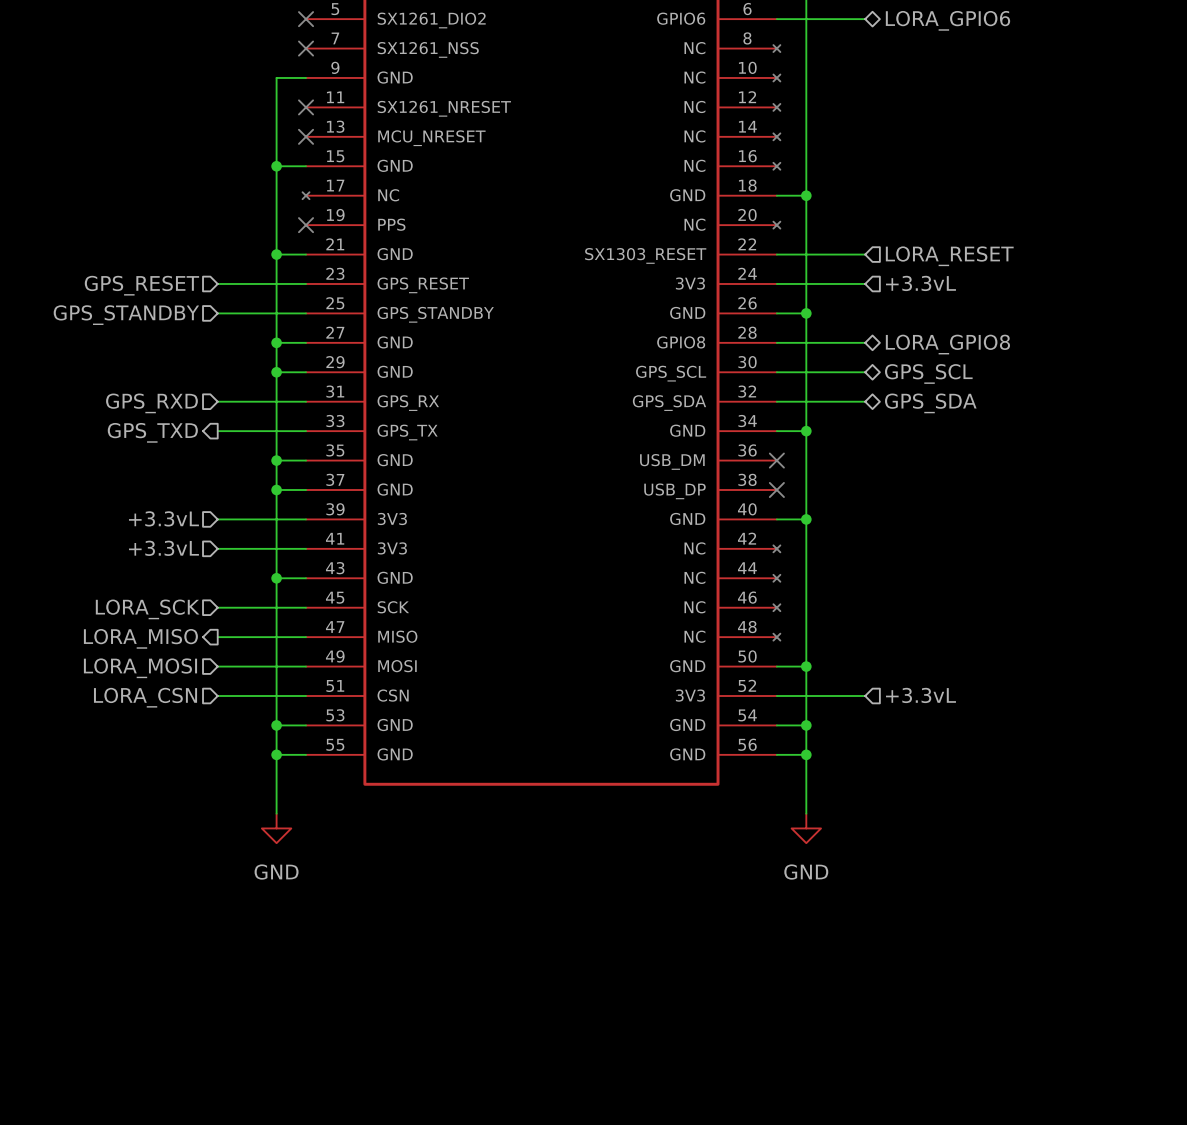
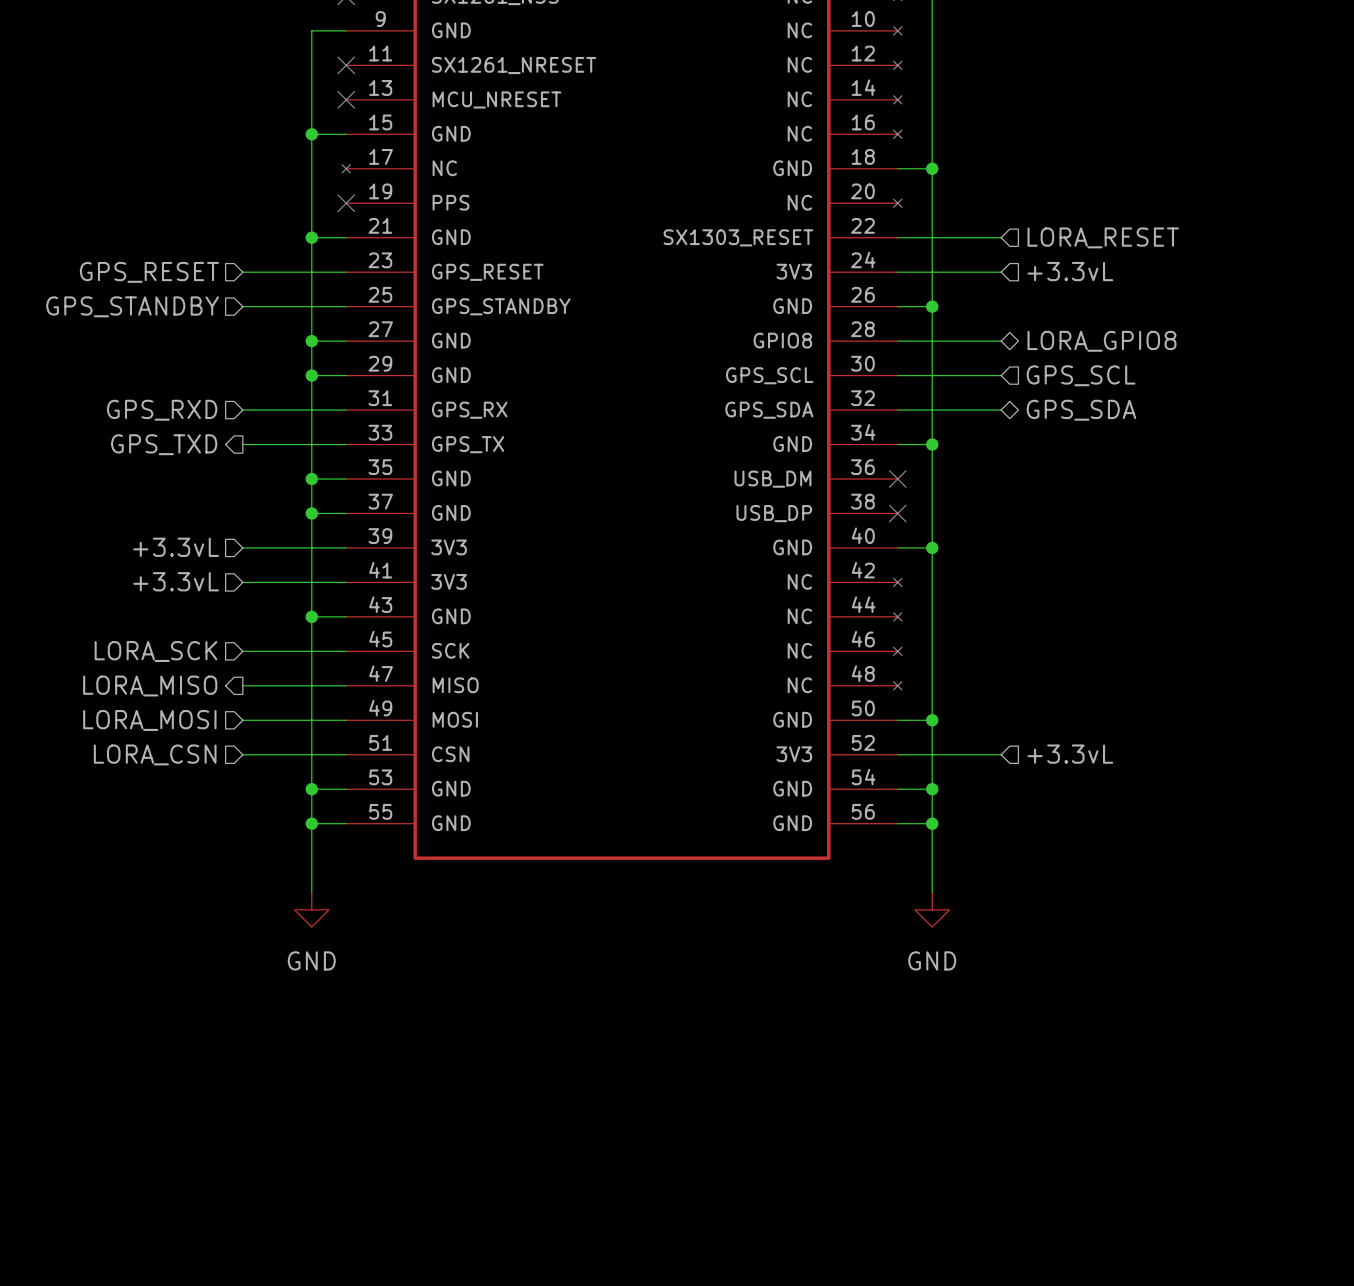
hierarchical label shape: bidirectional (928, 373) -> input (1081, 375)

